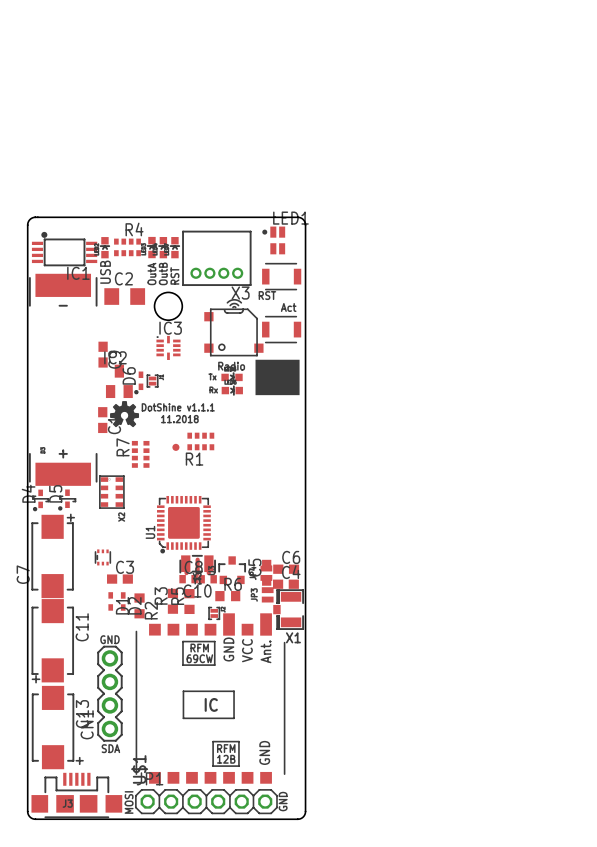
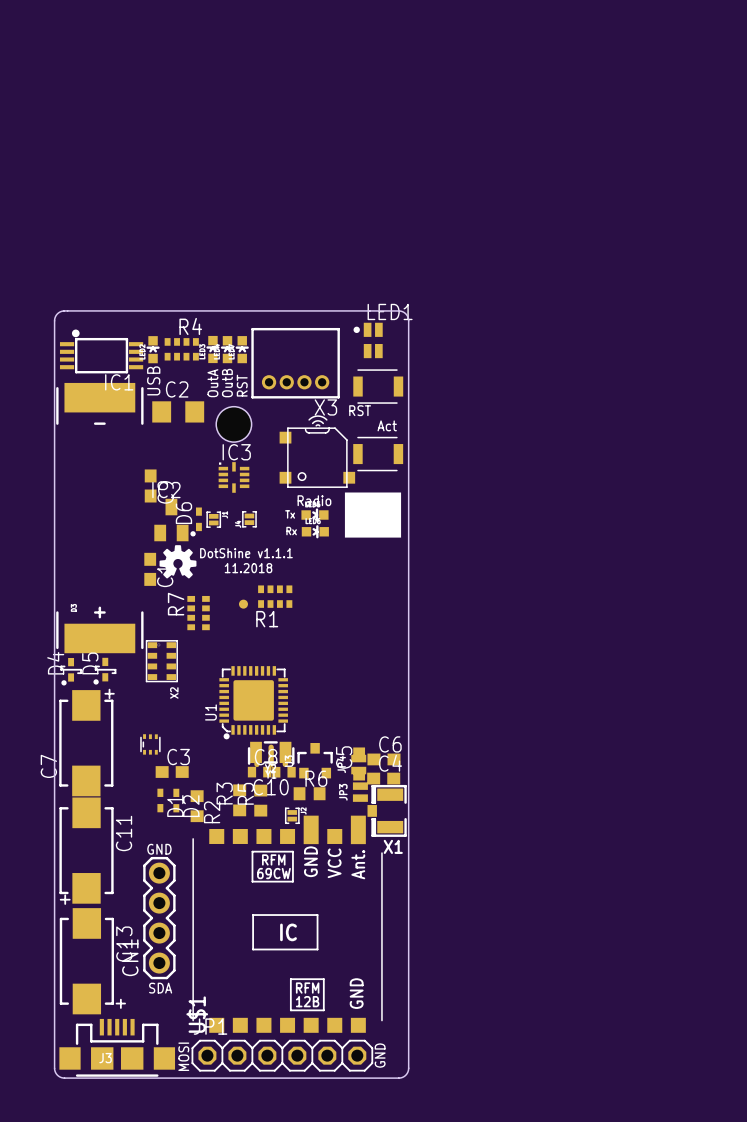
part: none -> (249, 519)

